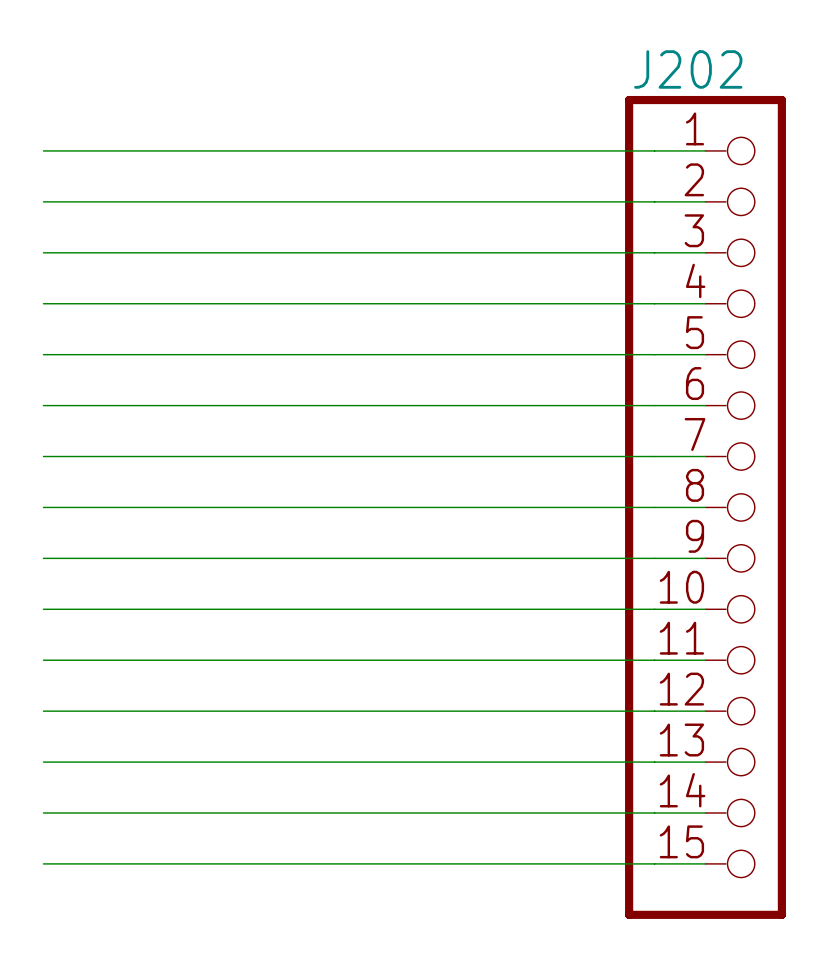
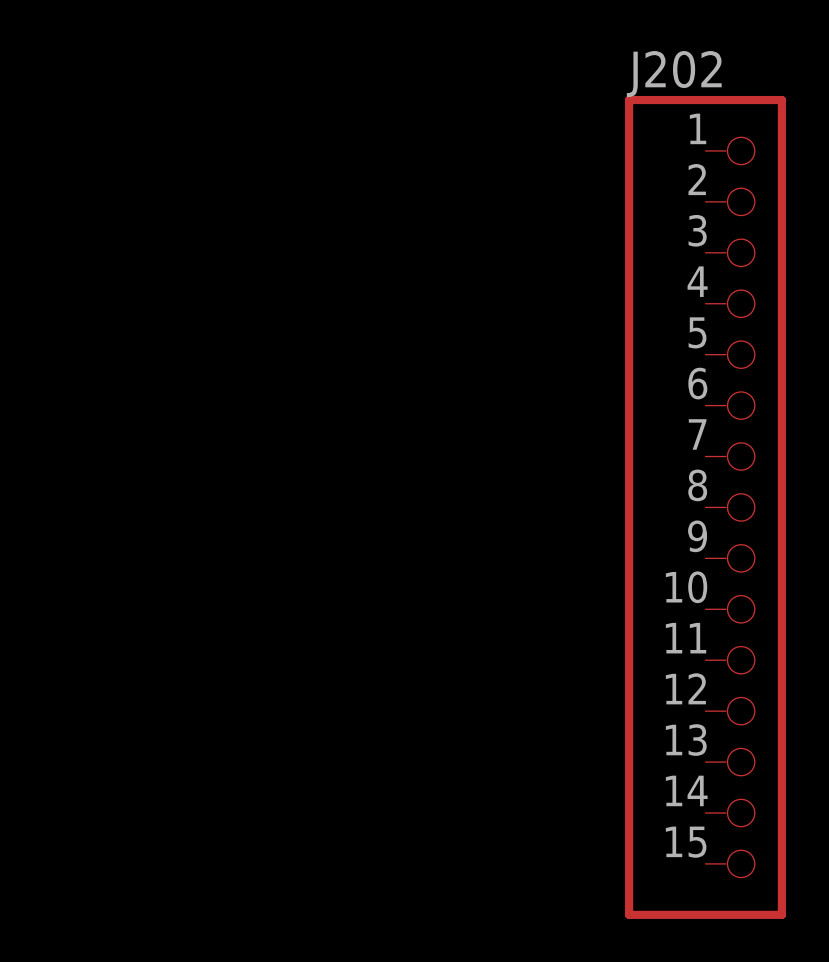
wire: (43, 150) (705, 150) -> none
wire: (43, 201) (705, 201) -> none
wire: (43, 252) (705, 252) -> none
wire: (43, 303) (705, 303) -> none
wire: (43, 354) (705, 354) -> none
wire: (43, 405) (705, 405) -> none
wire: (43, 456) (705, 456) -> none
wire: (43, 507) (705, 507) -> none
wire: (43, 558) (705, 558) -> none
wire: (43, 609) (705, 609) -> none
wire: (43, 660) (705, 660) -> none
wire: (43, 711) (705, 711) -> none
wire: (43, 762) (705, 762) -> none
wire: (43, 813) (705, 813) -> none
wire: (43, 863) (705, 863) -> none

